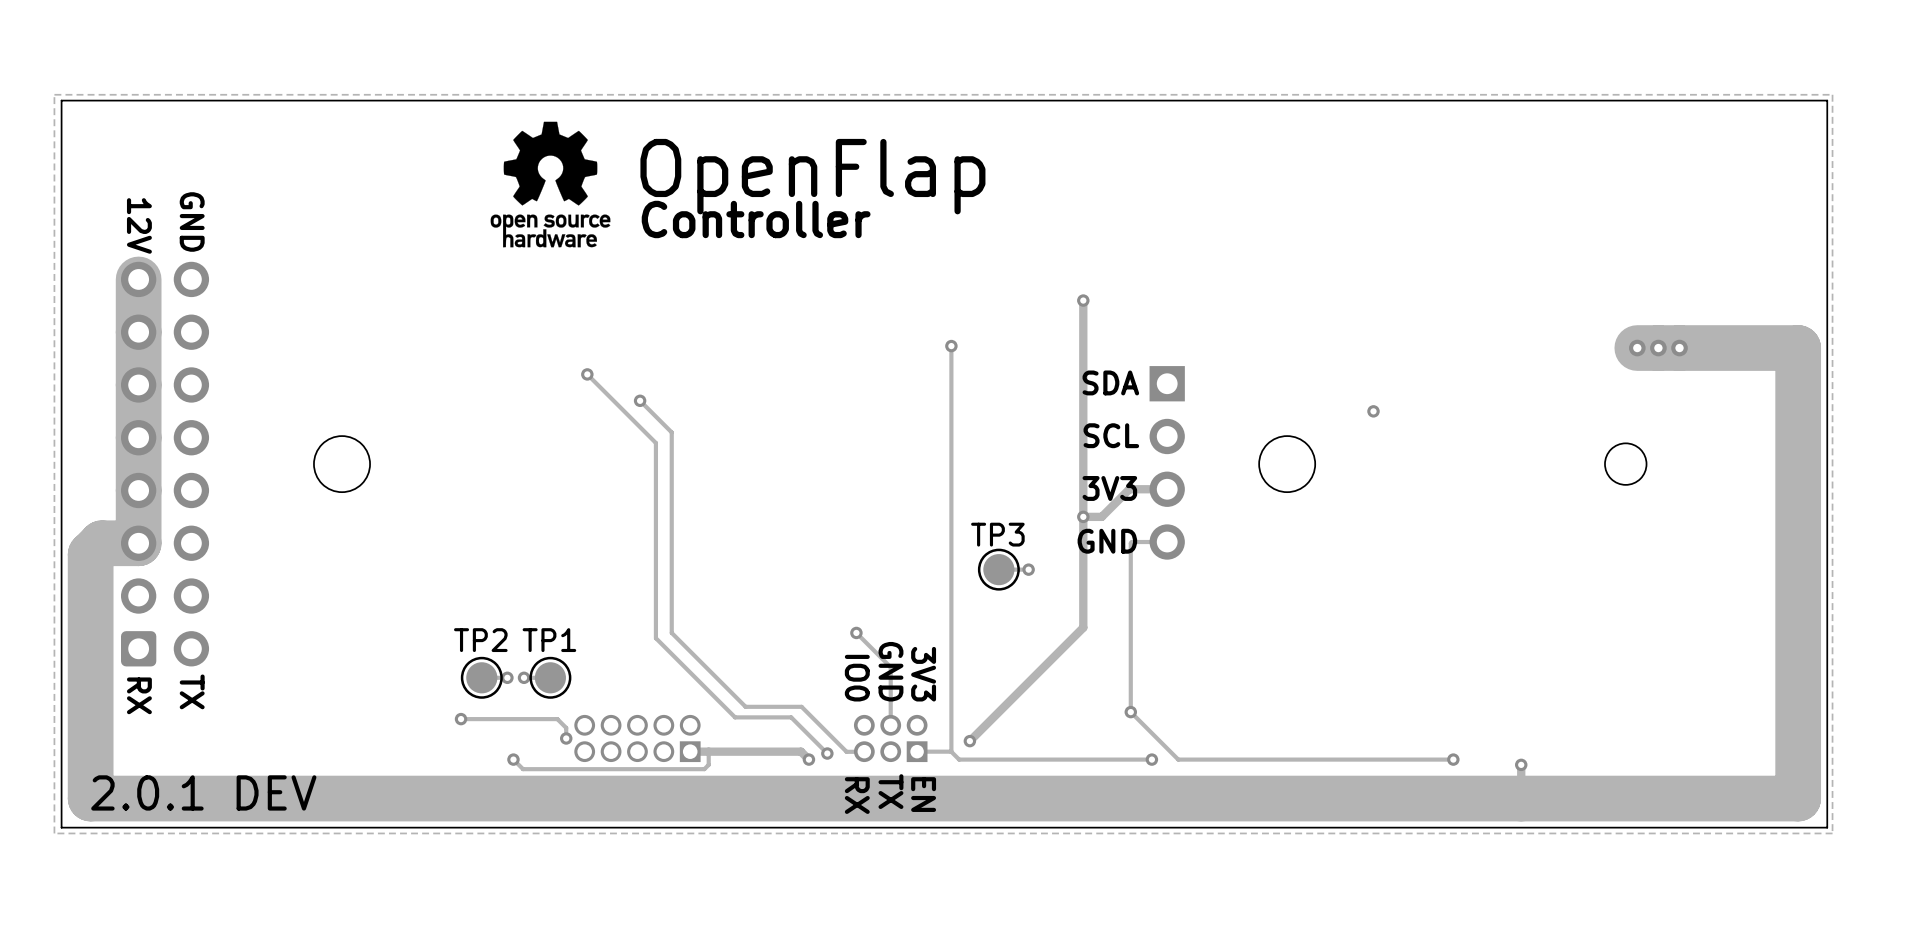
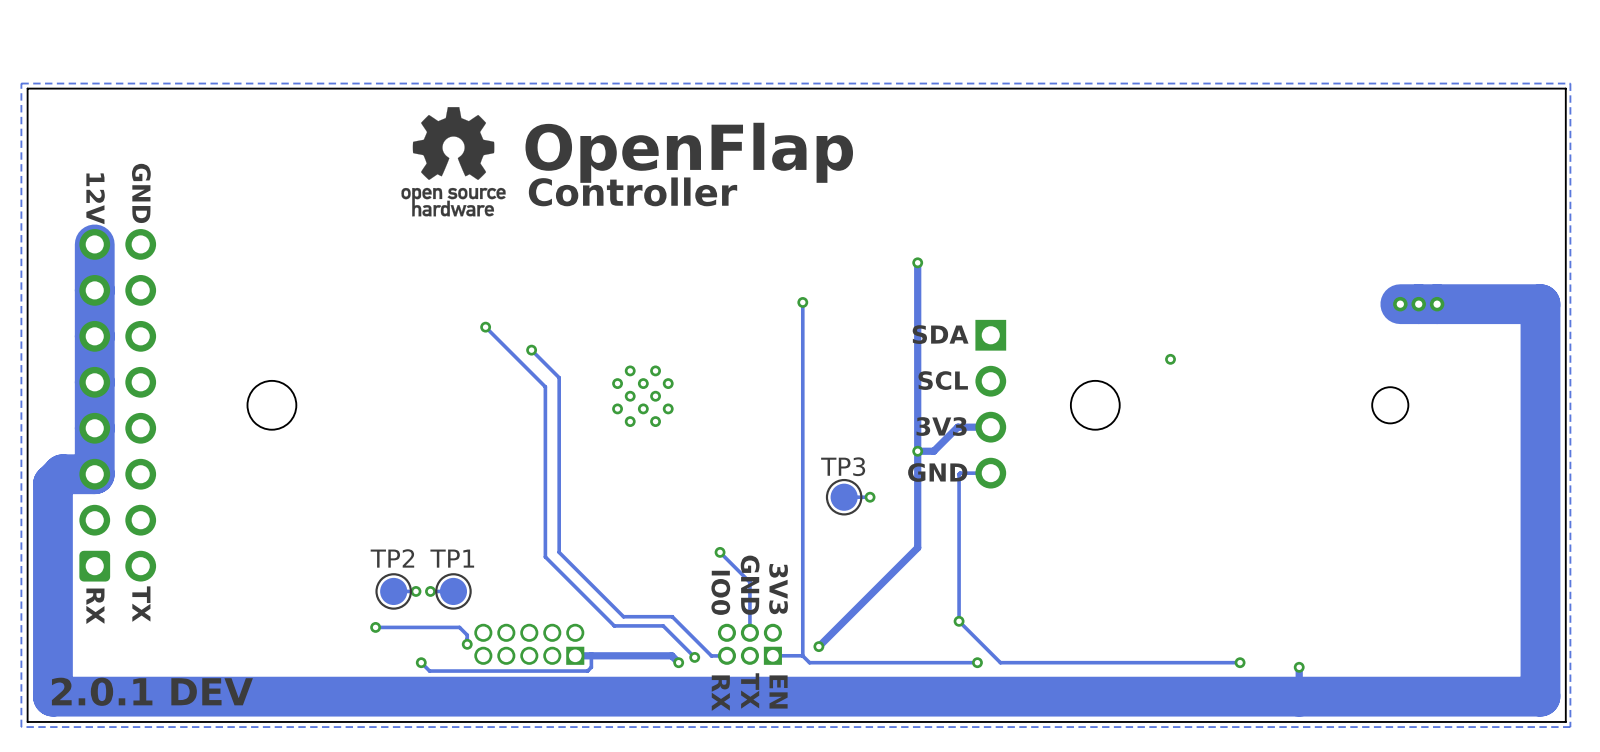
part: none -> (642, 396)

